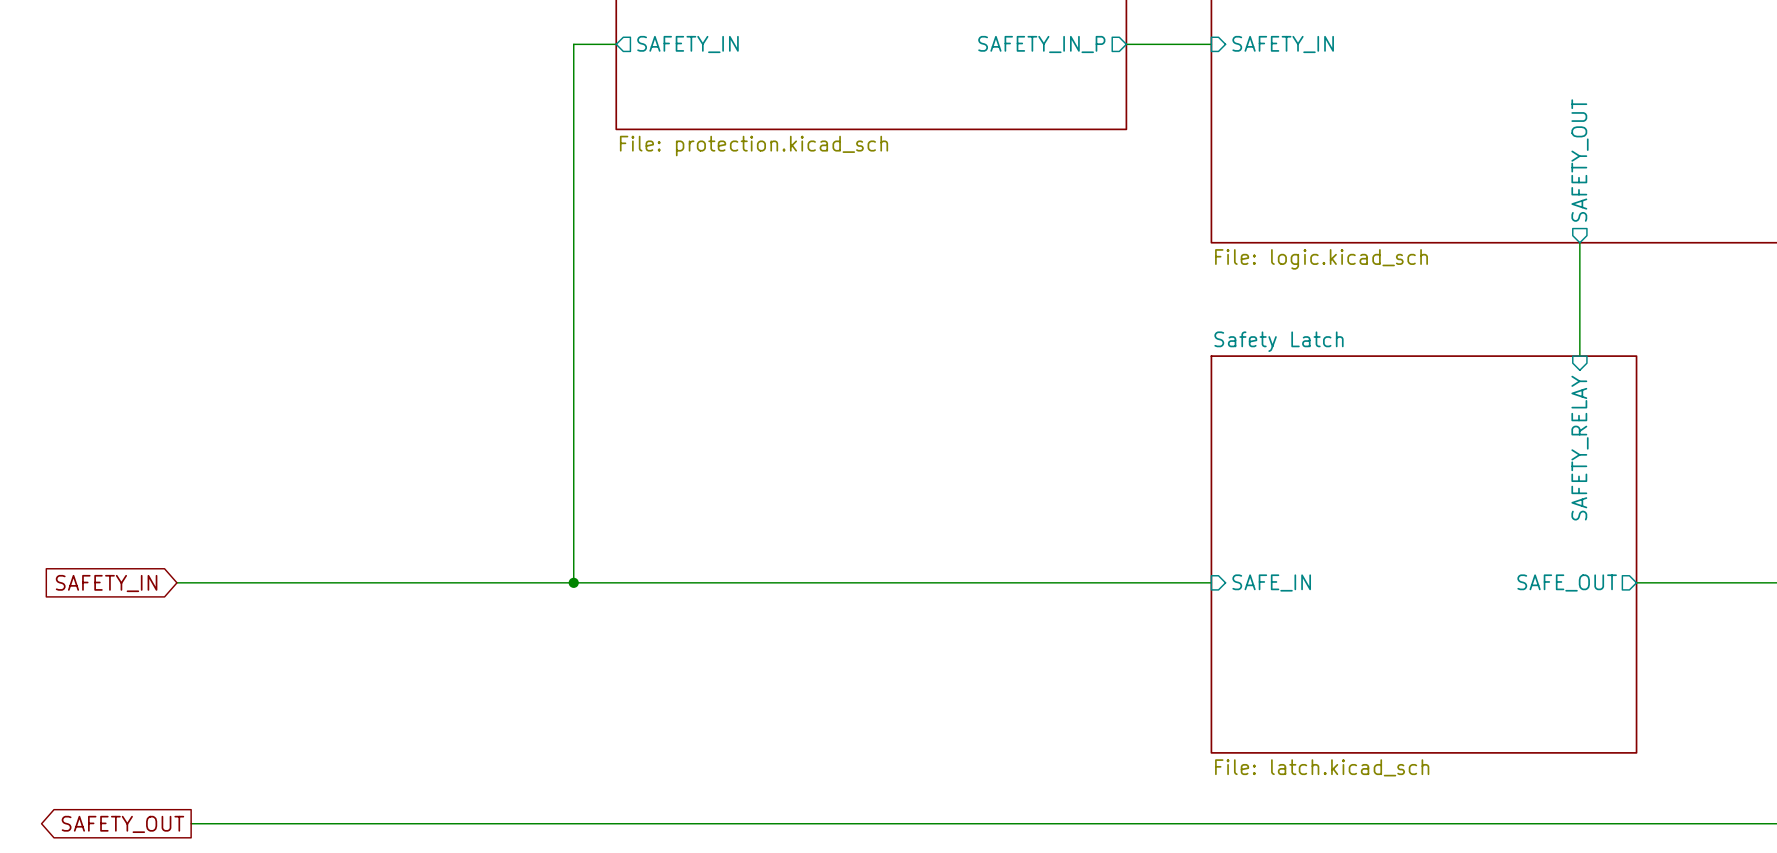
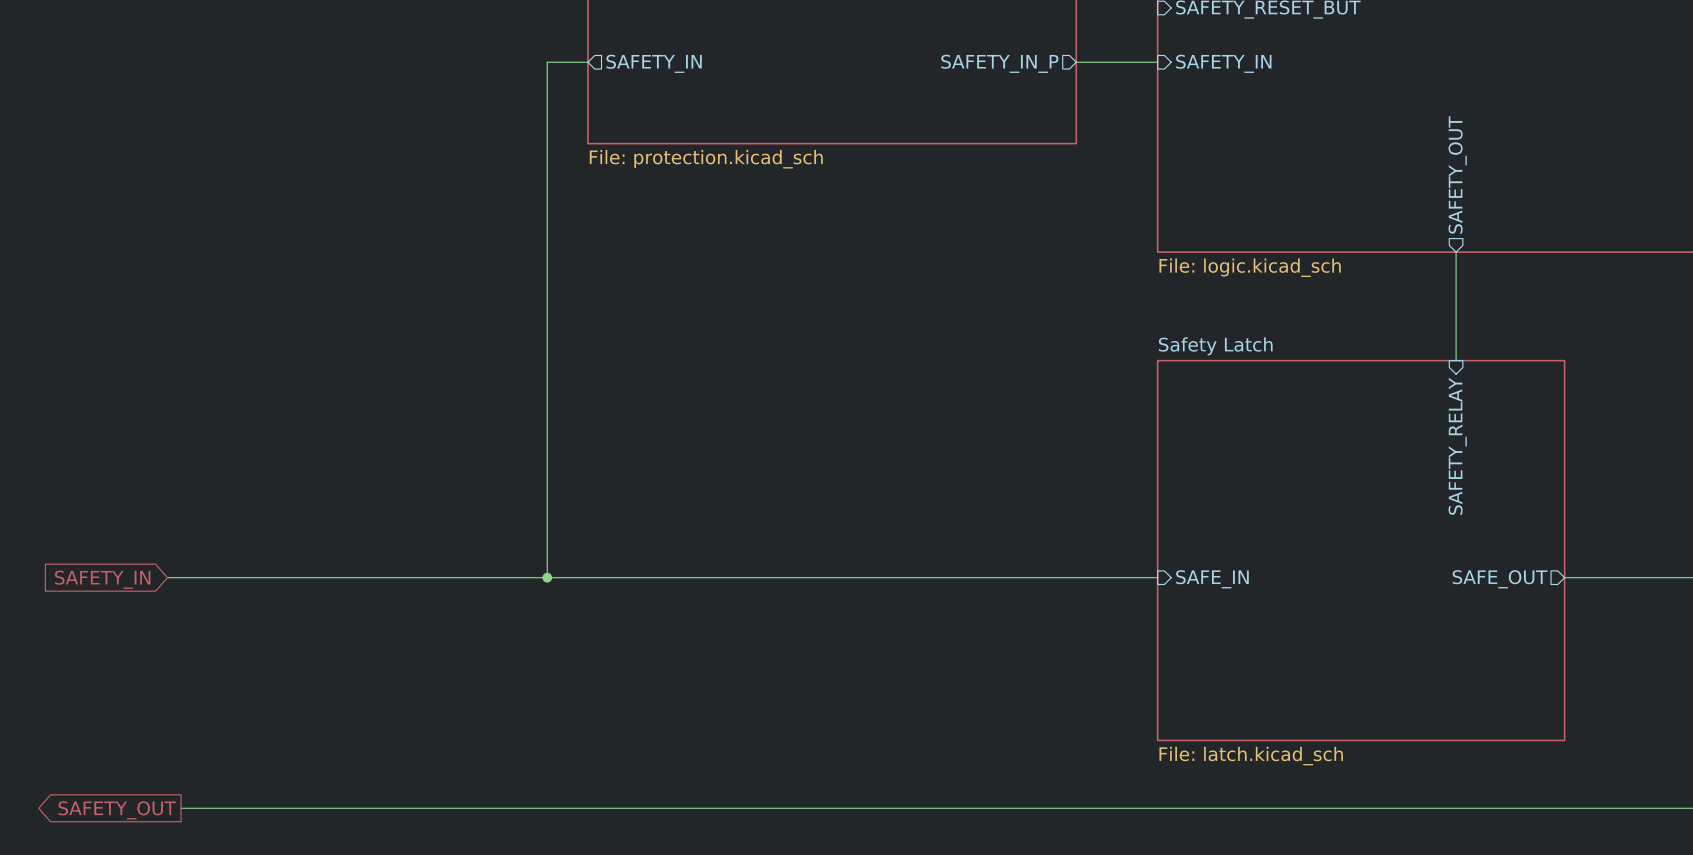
sheet pin position: SAFETY_OUT (1580, 160) -> SAFETY_OUT (1457, 174)
wire: (1579, 242) (1579, 356) -> (1456, 252) (1456, 360)
sheet pin position: SAFETY_RELAY (1580, 448) -> SAFETY_RELAY (1457, 446)

